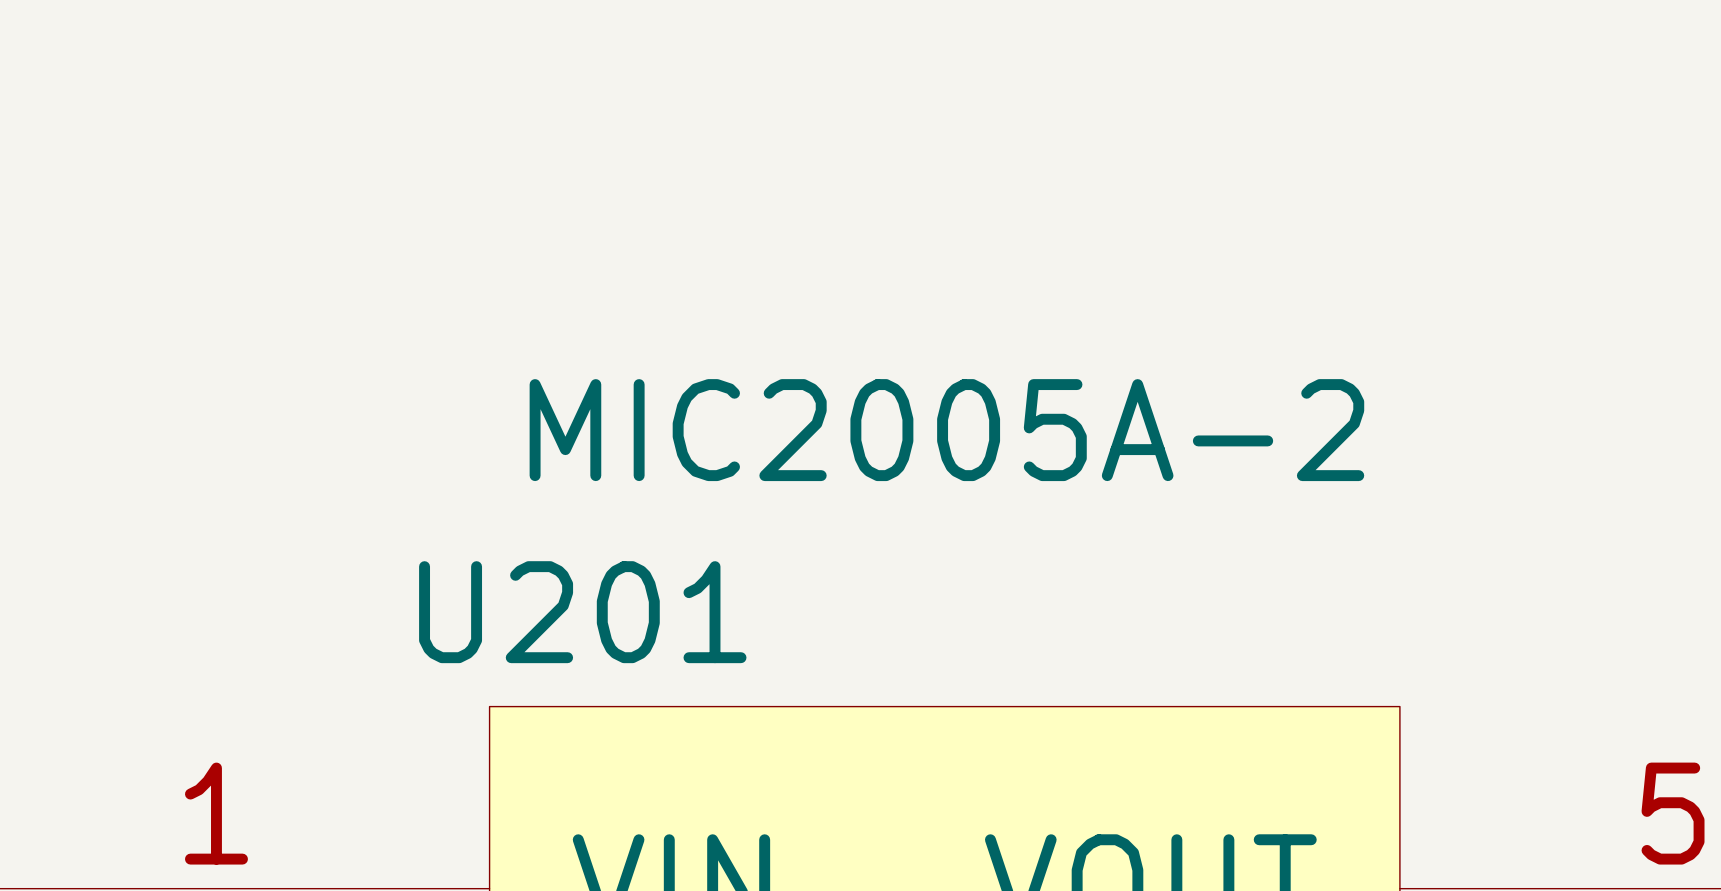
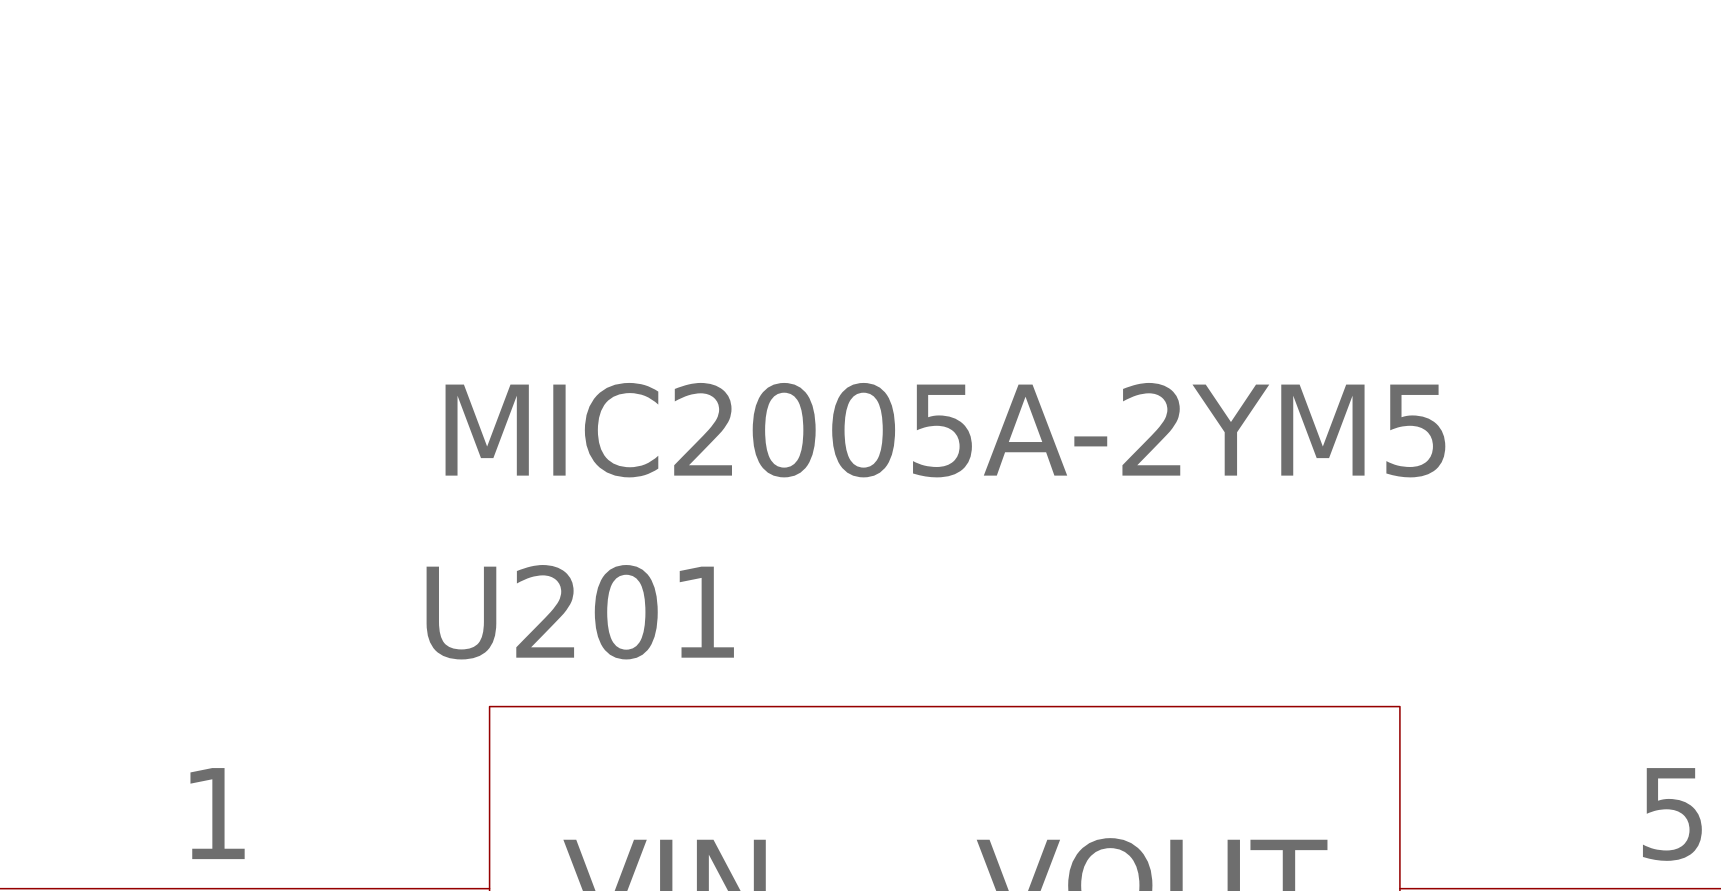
U201 value: MIC2005A-2 (946, 430) -> MIC2005A-2YM5 (945, 430)

